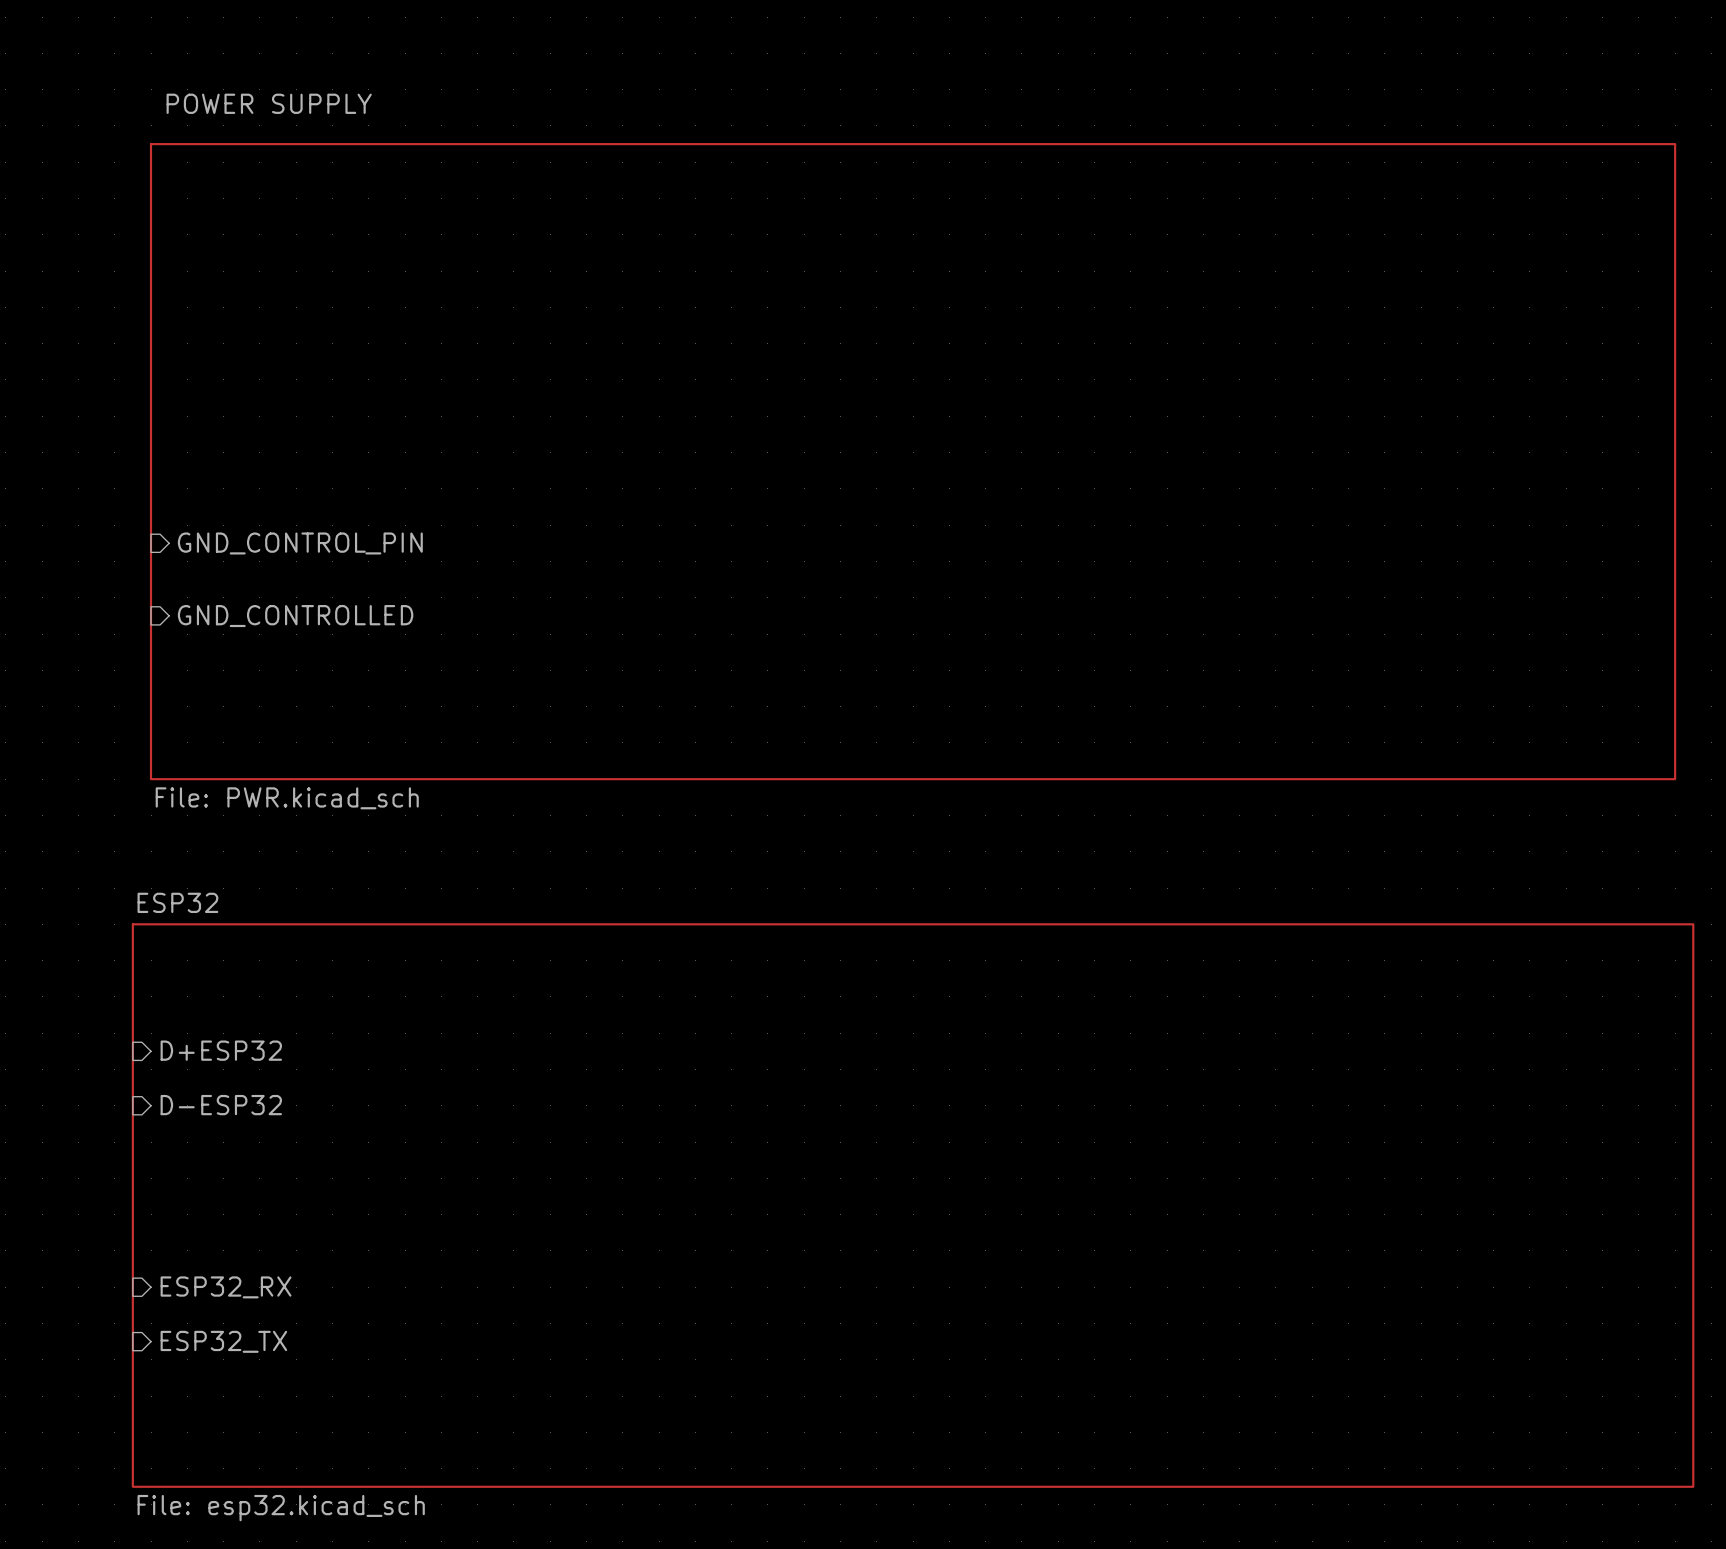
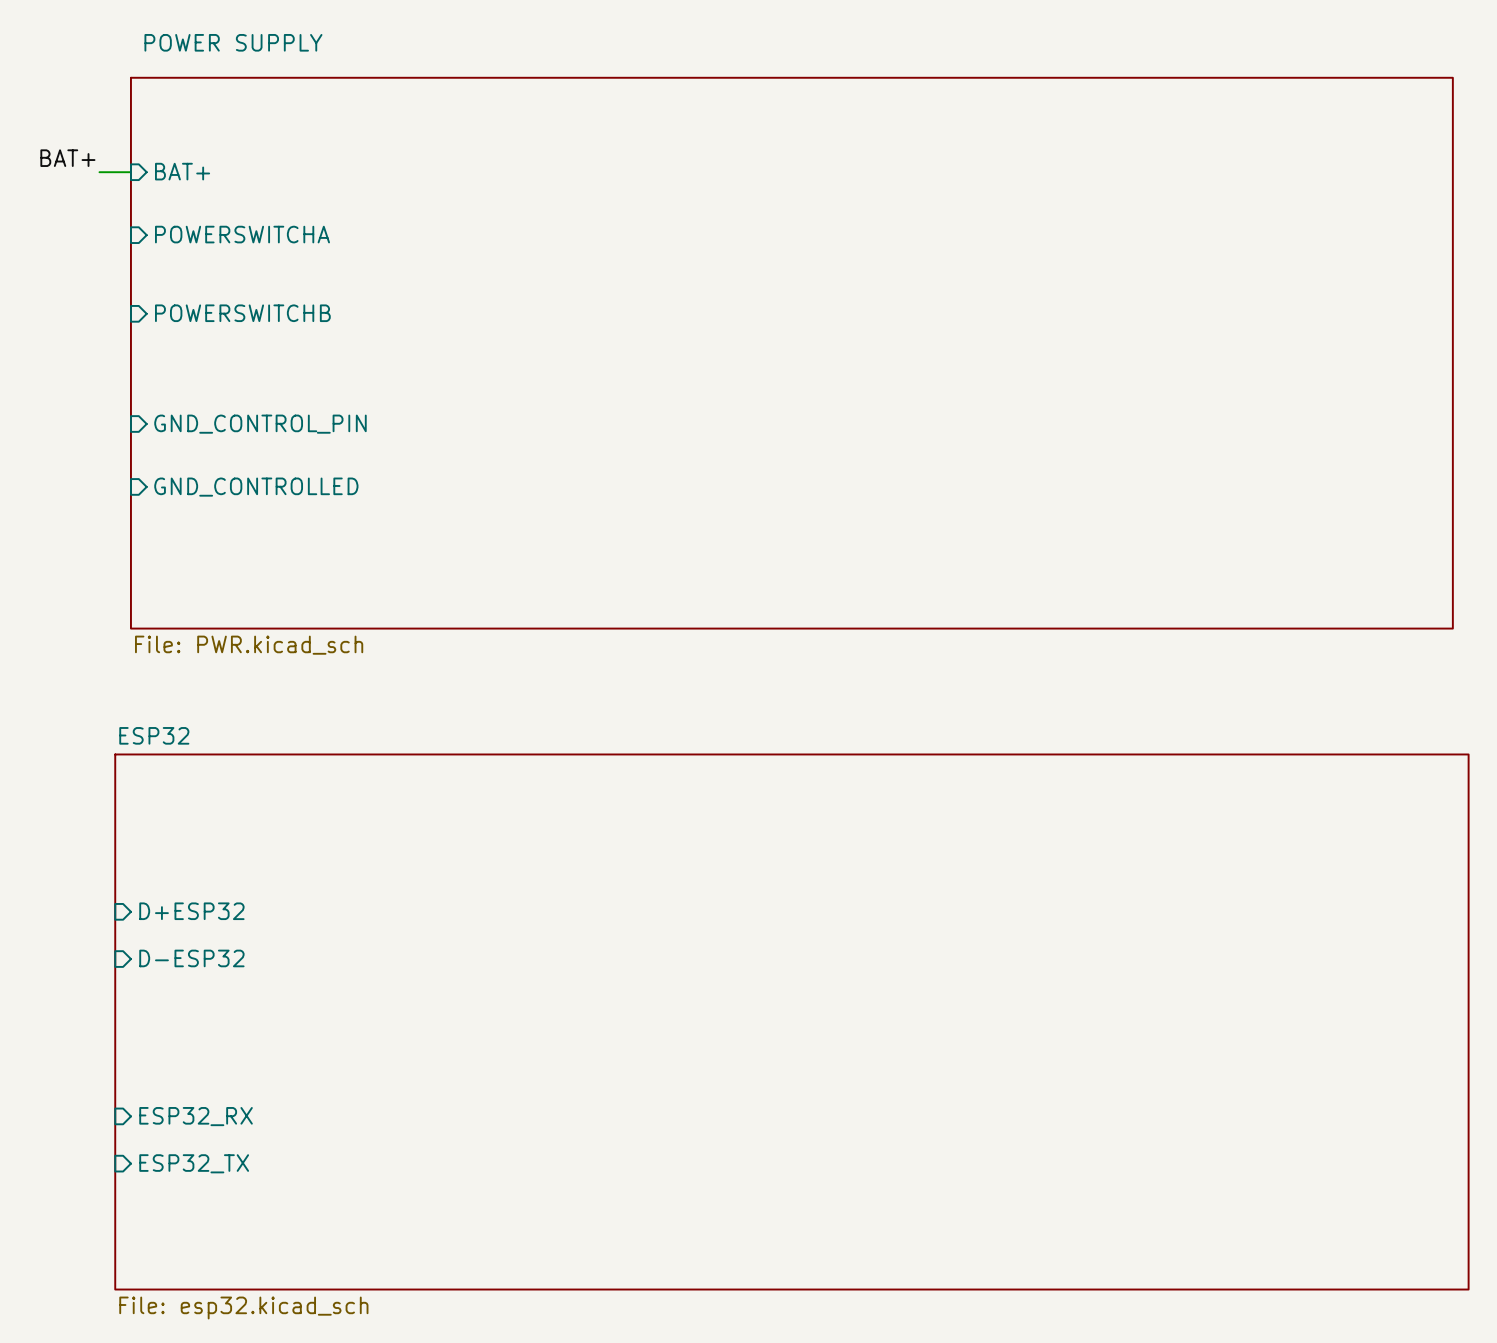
label: none -> BAT+ (67, 158)
sheet pin: none -> BAT+ (182, 171)
wire: none -> (99, 172) (130, 172)
sheet pin: none -> POWERSWITCHA (242, 234)
sheet pin: none -> POWERSWITCHB (242, 313)
sheet POWER SUPPLY position: (913, 461) -> (791, 353)
sheet pin position: GND_CONTROL_PIN (300, 543) -> GND_CONTROL_PIN (260, 424)
sheet pin position: GND_CONTROLLED (295, 616) -> GND_CONTROLLED (256, 487)
sheet ESP32 shape: [131, 923, 1695, 1488] -> [114, 753, 1470, 1291]

